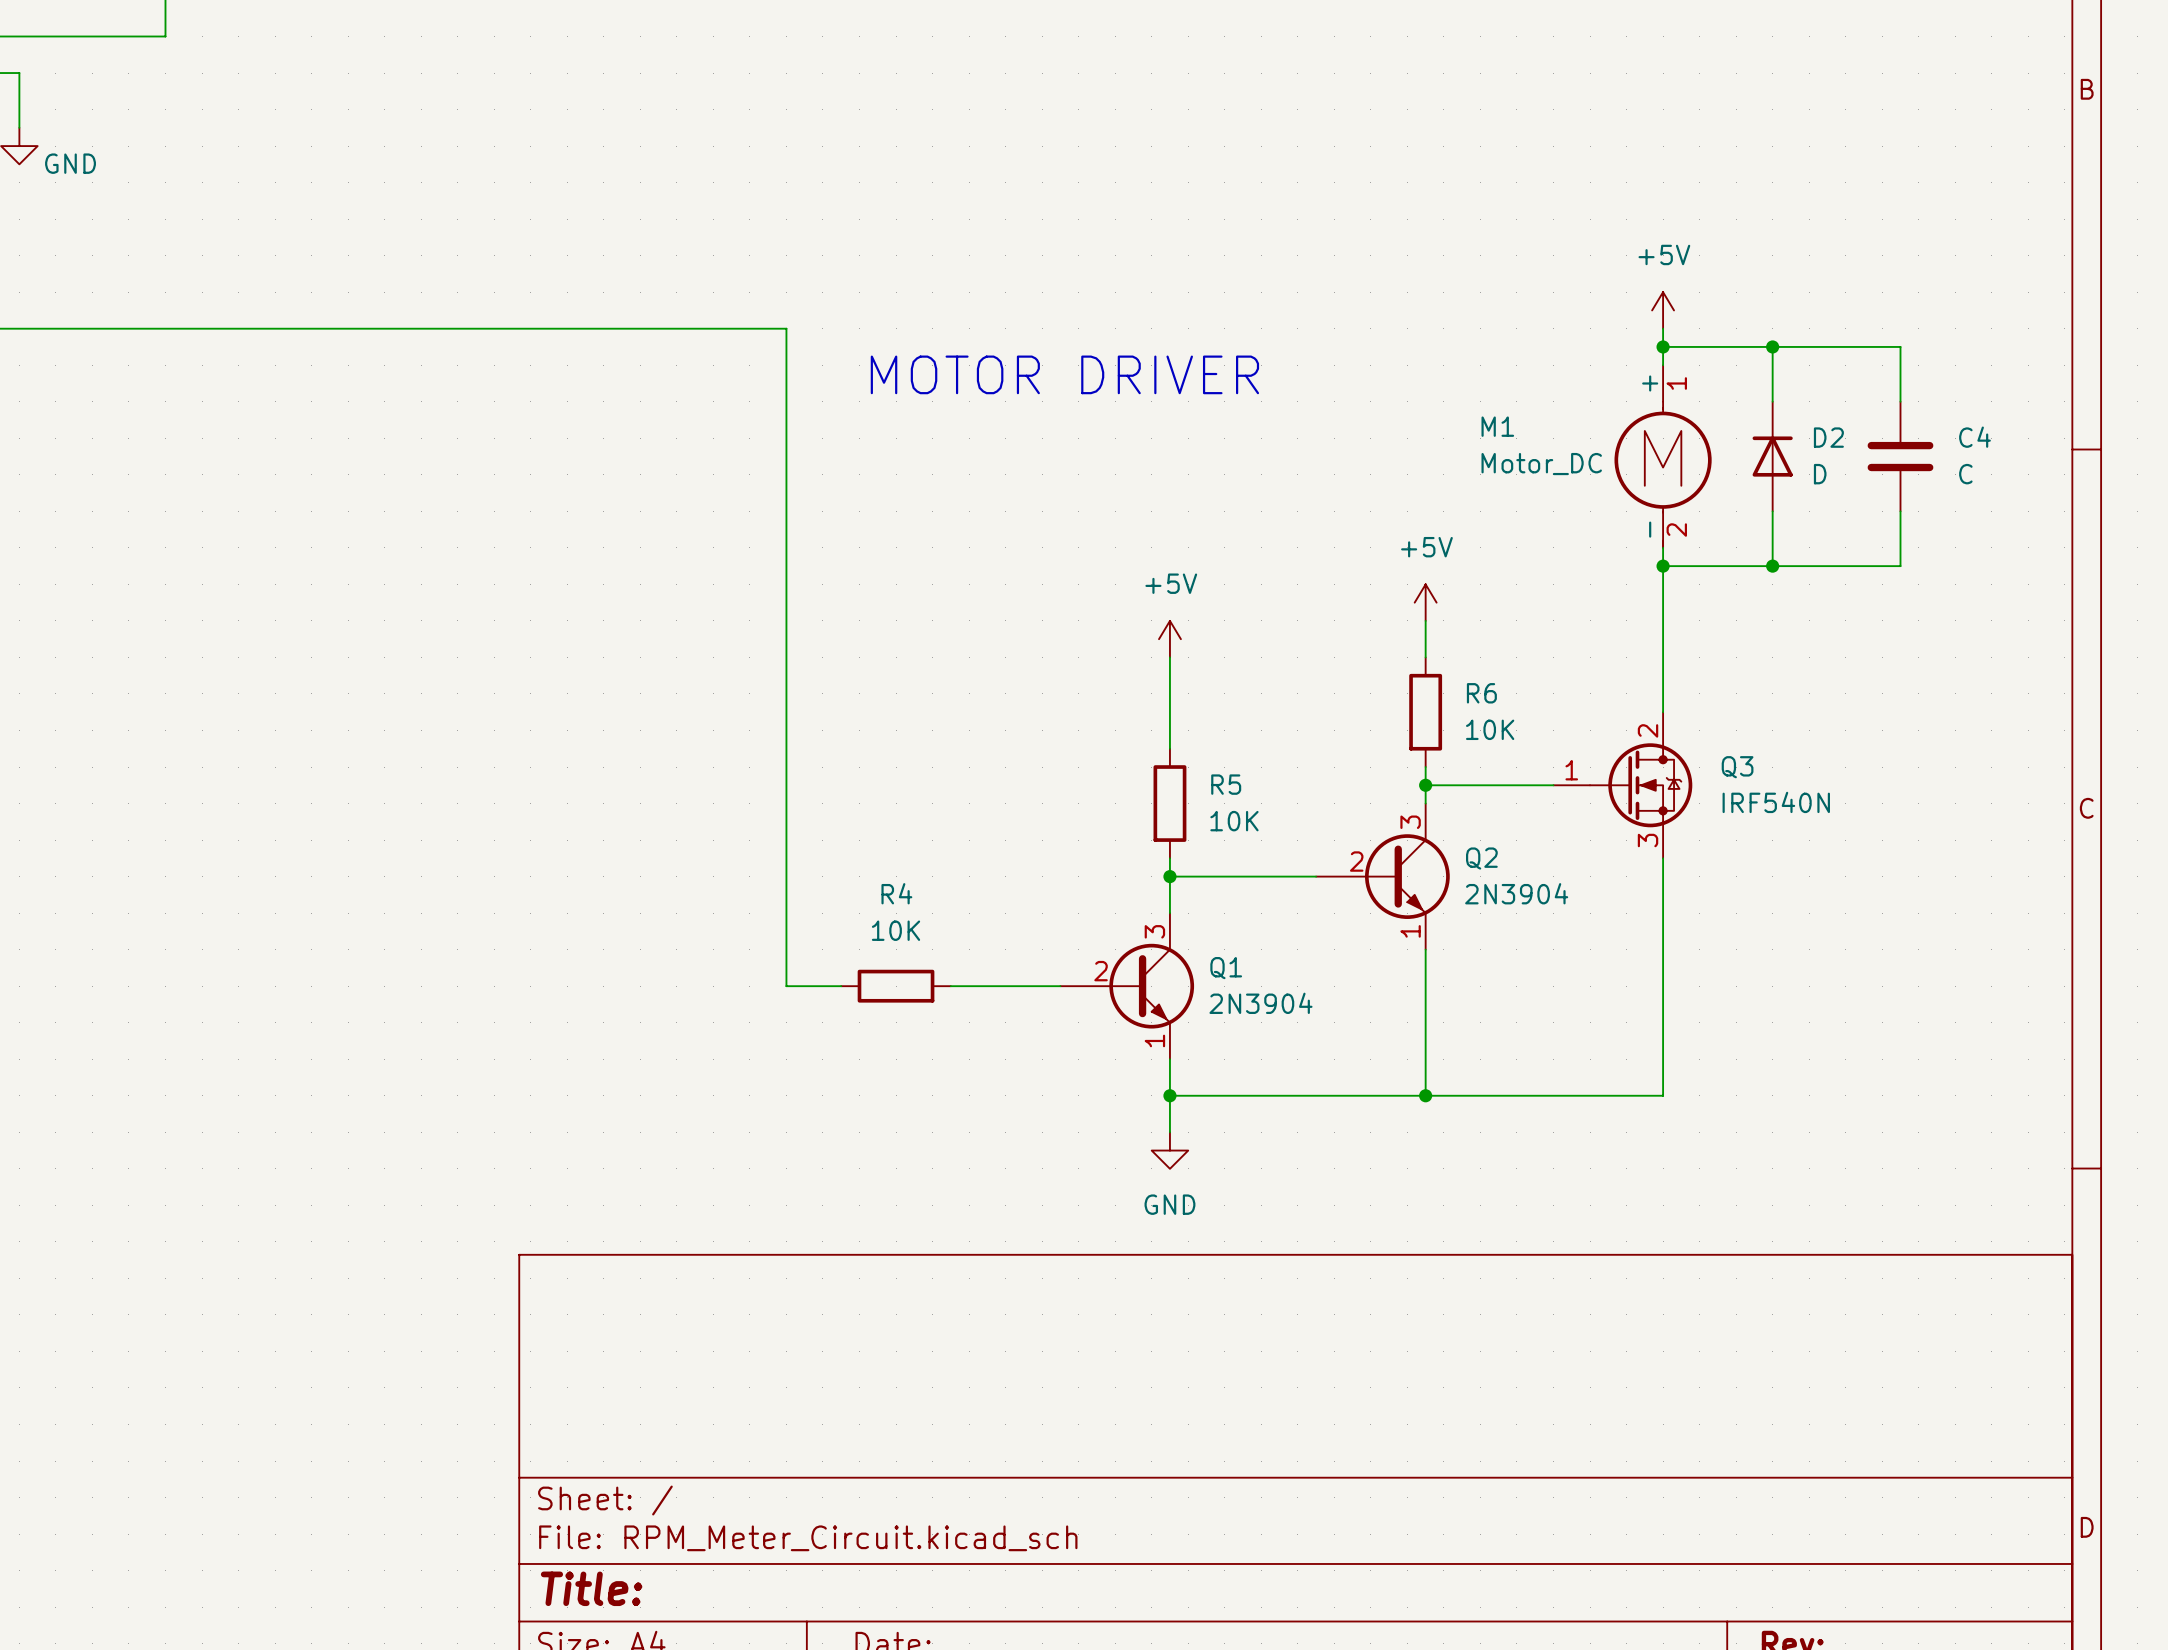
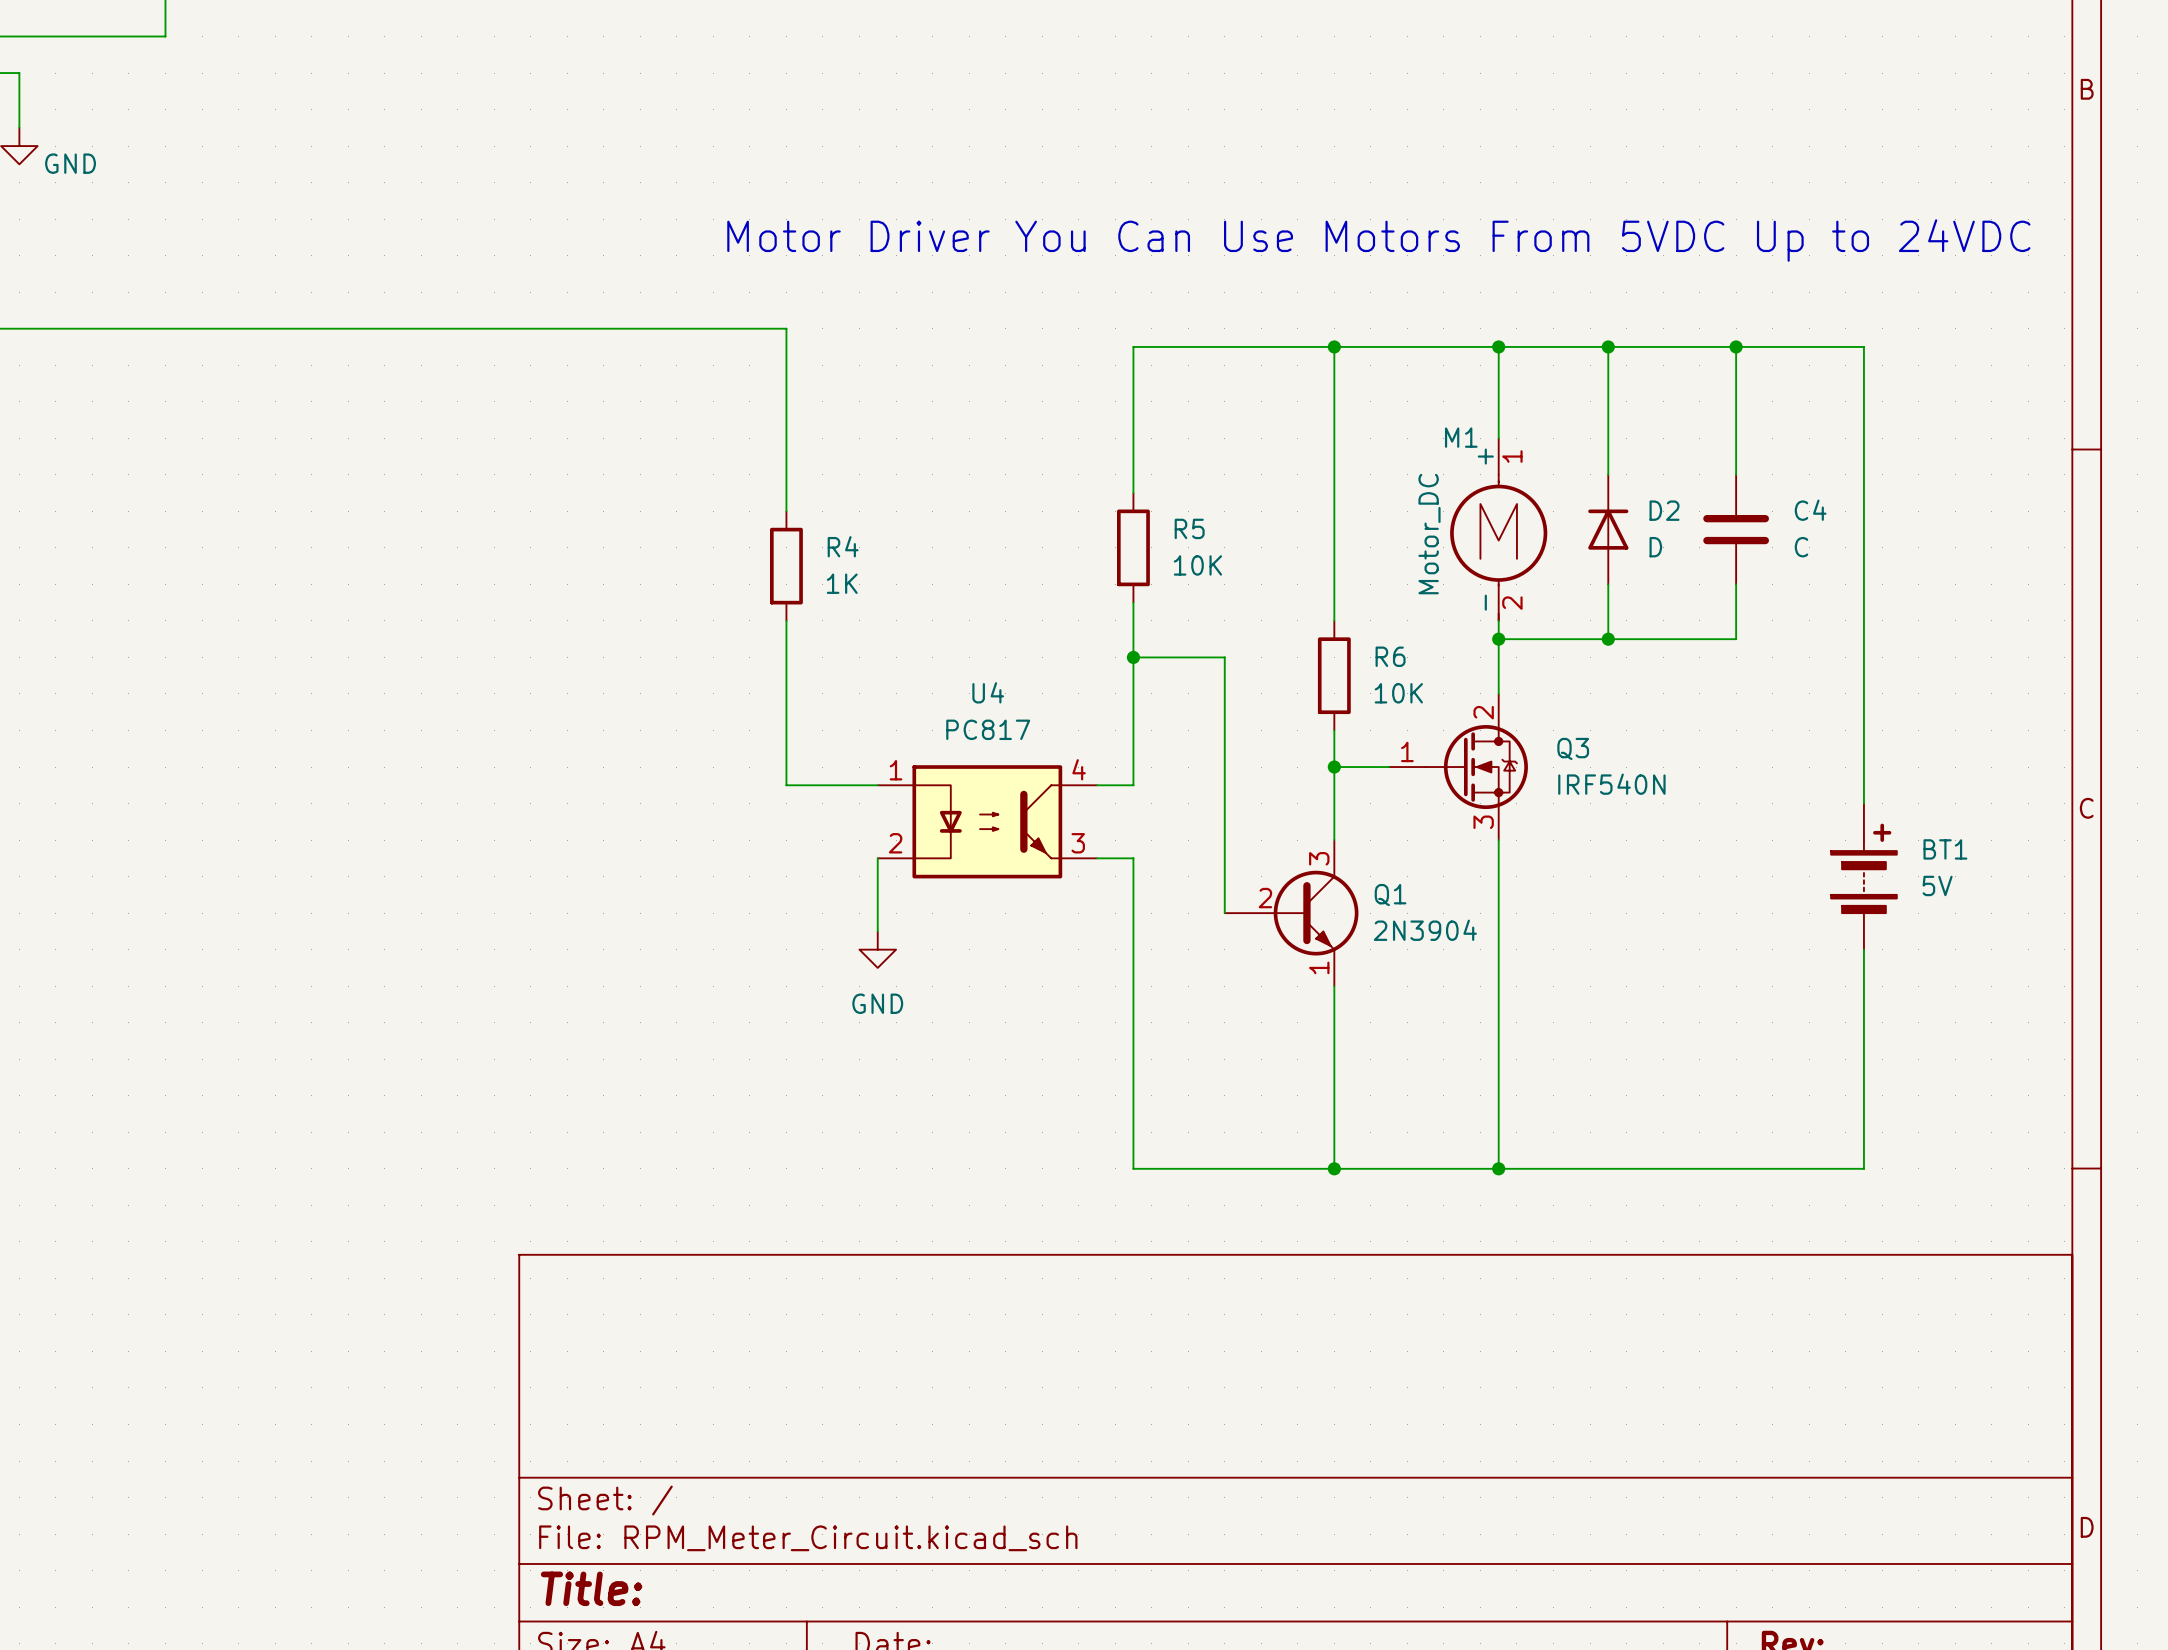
text: none -> Motor Driver You Can Use Motors From 5VDC Up to 24VDC (1378, 240)
power symbol: +5V (1663, 310) -> none
wire: (1663, 328) (1663, 365) -> none
wire: none -> (1334, 346) (1334, 620)
junction: none -> (1334, 346)
wire: none -> (1498, 346) (1498, 438)
junction: none -> (1498, 346)
wire: none -> (1608, 346) (1608, 474)
junction: none -> (1608, 346)
wire: none -> (1663, 346) (1133, 346) (1133, 493)
junction: (1663, 346) -> none
wire: none -> (1736, 346) (1736, 474)
junction: none -> (1736, 346)
wire: (1772, 346) (1772, 401) -> none
junction: (1772, 346) -> none
wire: (1863, 346) (1900, 346) (1900, 401) -> (1863, 346) (1863, 803)
text: MOTOR DRIVER (1064, 374) -> none
M1 name position: M1 (1497, 426) -> M1 (1461, 437)
M1 position: (1663, 456) -> (1498, 529)
D2 position: (1772, 456) -> (1608, 529)
C4 position: (1900, 456) -> (1736, 529)
M1 value rotation: 0° (1541, 464) -> 90° counterclockwise (1429, 534)
wire: (786, 511) (786, 620) -> none
wire: (1772, 511) (1772, 566) -> (1608, 584) (1608, 639)
wire: (1900, 511) (1900, 566) (1663, 566) -> (1736, 584) (1736, 639) (1498, 639)
wire: (1663, 547) (1663, 712) -> none
junction: (1663, 566) -> none
junction: (1772, 566) -> none
wire: none -> (1133, 602) (1133, 785) (1096, 785)
power symbol: +5V (1425, 602) -> none
wire: (1425, 620) (1425, 657) -> none
wire: none -> (1498, 620) (1498, 693)
power symbol: +5V (1169, 639) -> none
junction: none -> (1498, 639)
junction: none -> (1608, 639)
wire: none -> (1133, 657) (1224, 657) (1224, 913)
junction: none -> (1133, 657)
wire: (1169, 657) (1169, 748) -> none
R6 position: (1425, 712) -> (1334, 675)
wire: none -> (1334, 730) (1334, 840)
wire: none -> (1334, 767) (1389, 767)
junction: none -> (1334, 767)
wire: (1425, 767) (1425, 803) -> none
wire: (786, 785) (786, 986) (841, 986) -> (786, 785) (877, 785)
wire: (1425, 785) (1553, 785) -> none
junction: (1425, 785) -> none
Q3 position: (1622, 785) -> (1458, 767)
R5 position: (1169, 803) -> (1133, 547)
U4: none -> PC817 (987, 821)
wire: none -> (1498, 840) (1498, 1168)
wire: none -> (1096, 858) (1133, 858) (1133, 1168) (1863, 1168) (1863, 949)
wire: (1169, 858) (1169, 913) -> none
wire: (1663, 858) (1663, 1095) (1169, 1095) -> none
wire: (1169, 876) (1316, 876) -> none
junction: (1169, 876) -> none
Q2: 2N3904 (1382, 876) -> none
BT1: none -> 5V (1863, 876)
R4 name position: R4 (896, 893) -> R4 (843, 546)
R4 value: 10K (896, 930) -> 1K (842, 583)
wire: (1425, 949) (1425, 1095) -> none
R4 rotation: 0° (896, 986) -> 90° clockwise (786, 566)
R4 position: (896, 986) -> (786, 566)
wire: (950, 986) (1060, 986) -> none
Q1 position: (1127, 986) -> (1291, 913)
wire: none -> (1334, 986) (1334, 1168)
wire: (1169, 1059) (1169, 1132) -> (877, 858) (877, 931)
junction: (1169, 1095) -> none
junction: (1425, 1095) -> none
power symbol position: GND (1169, 1150) -> GND (877, 949)
junction: none -> (1334, 1168)
junction: none -> (1498, 1168)

